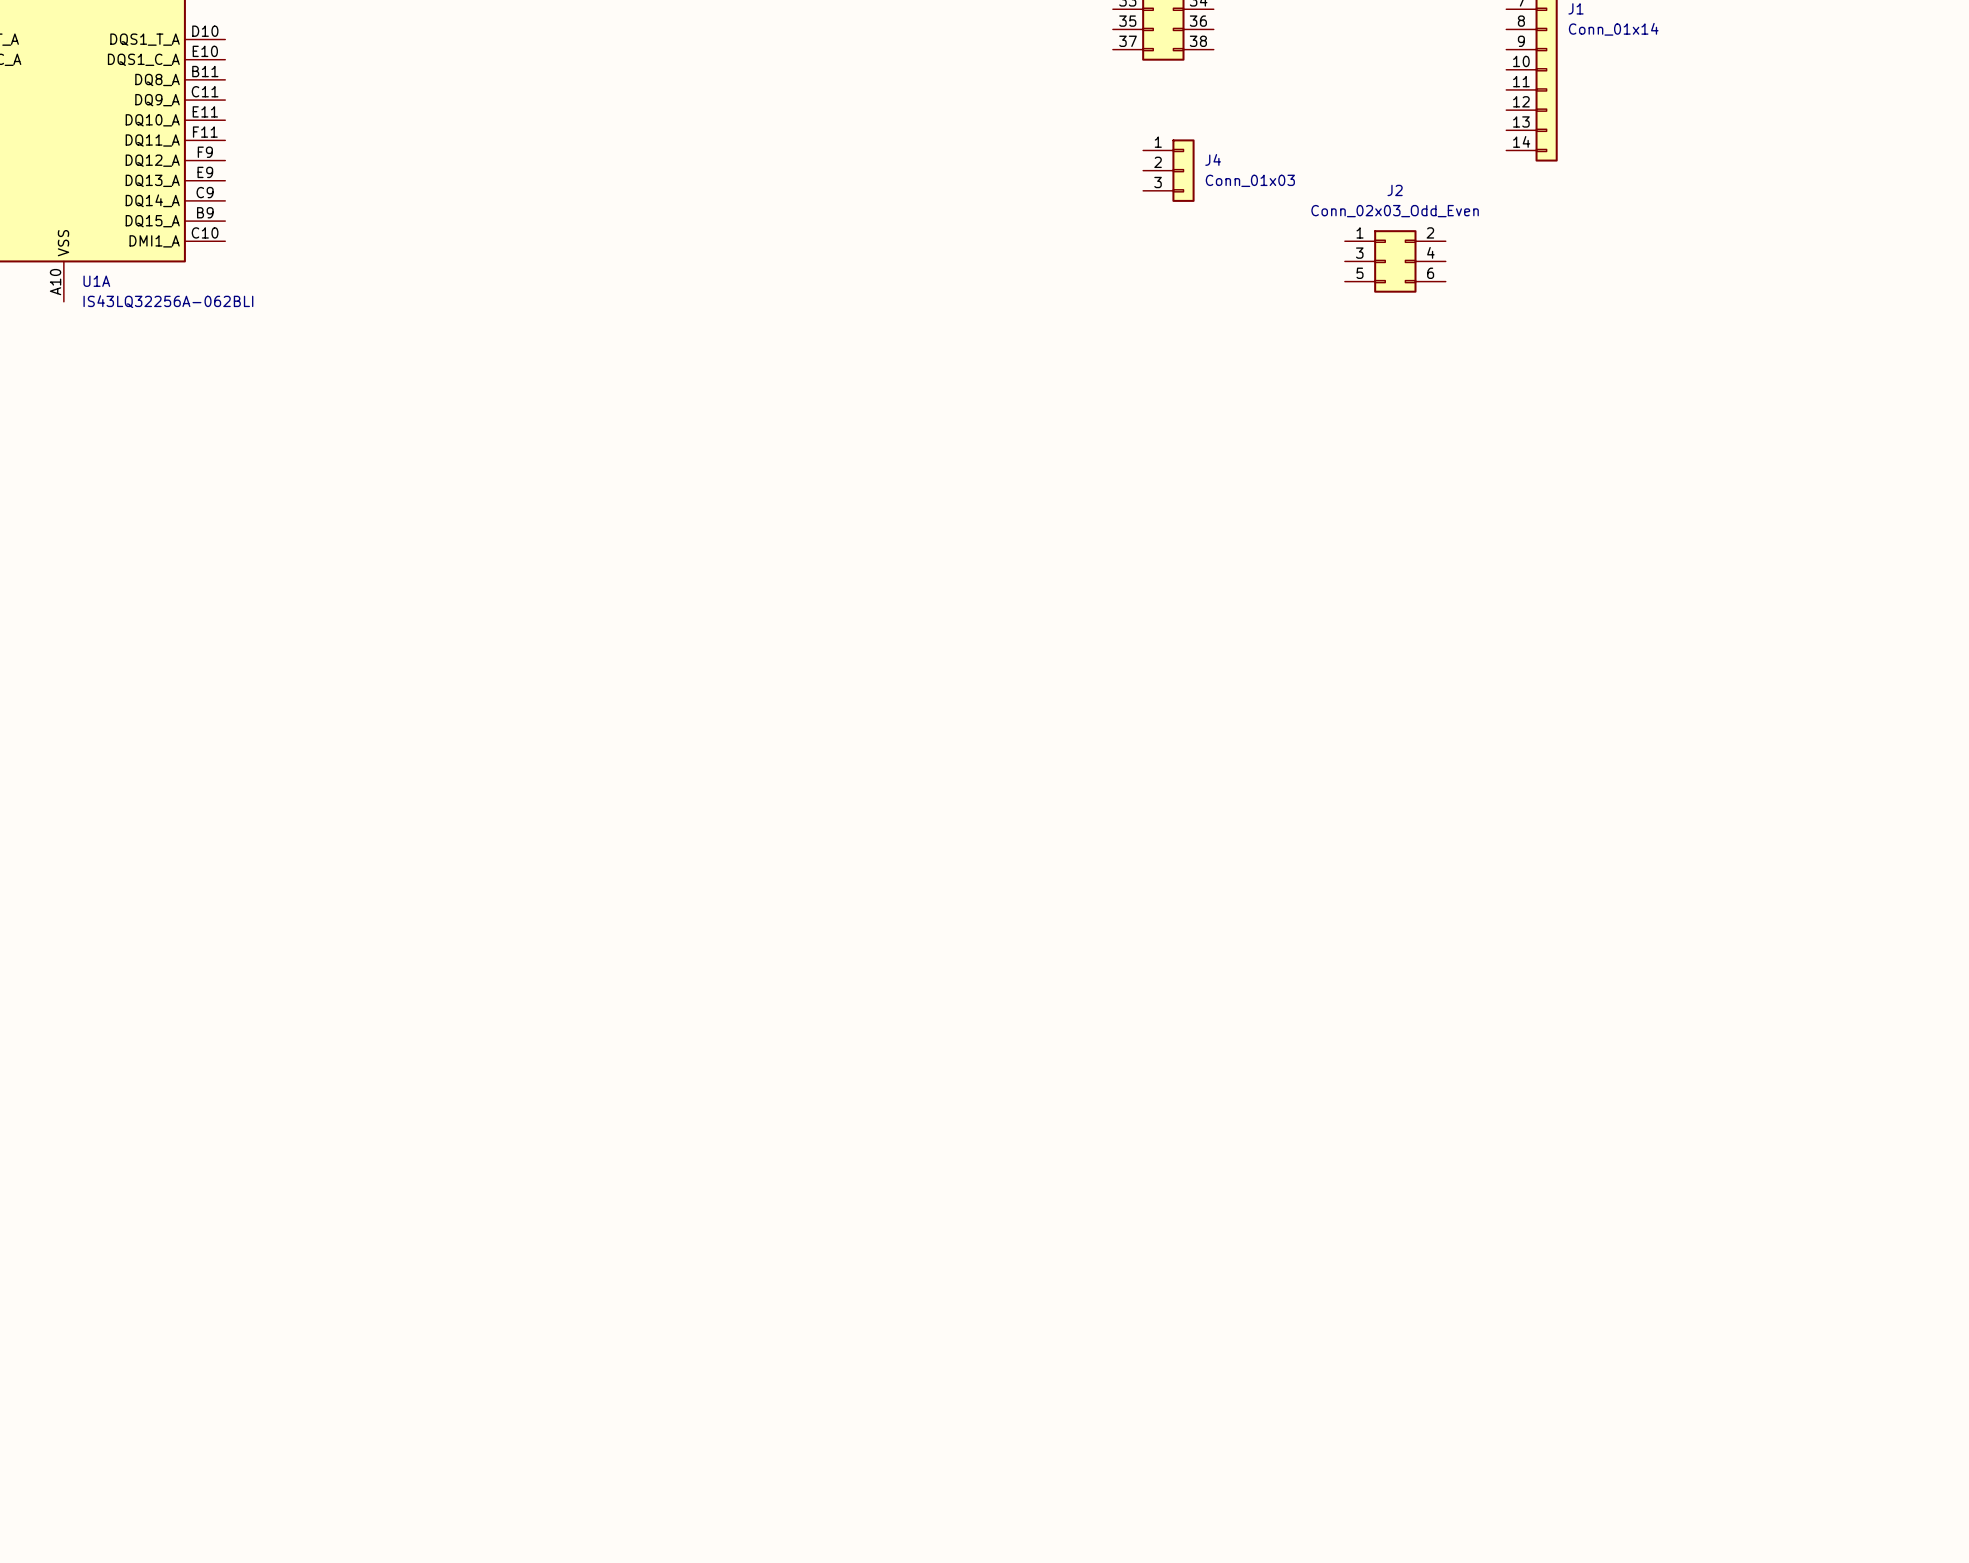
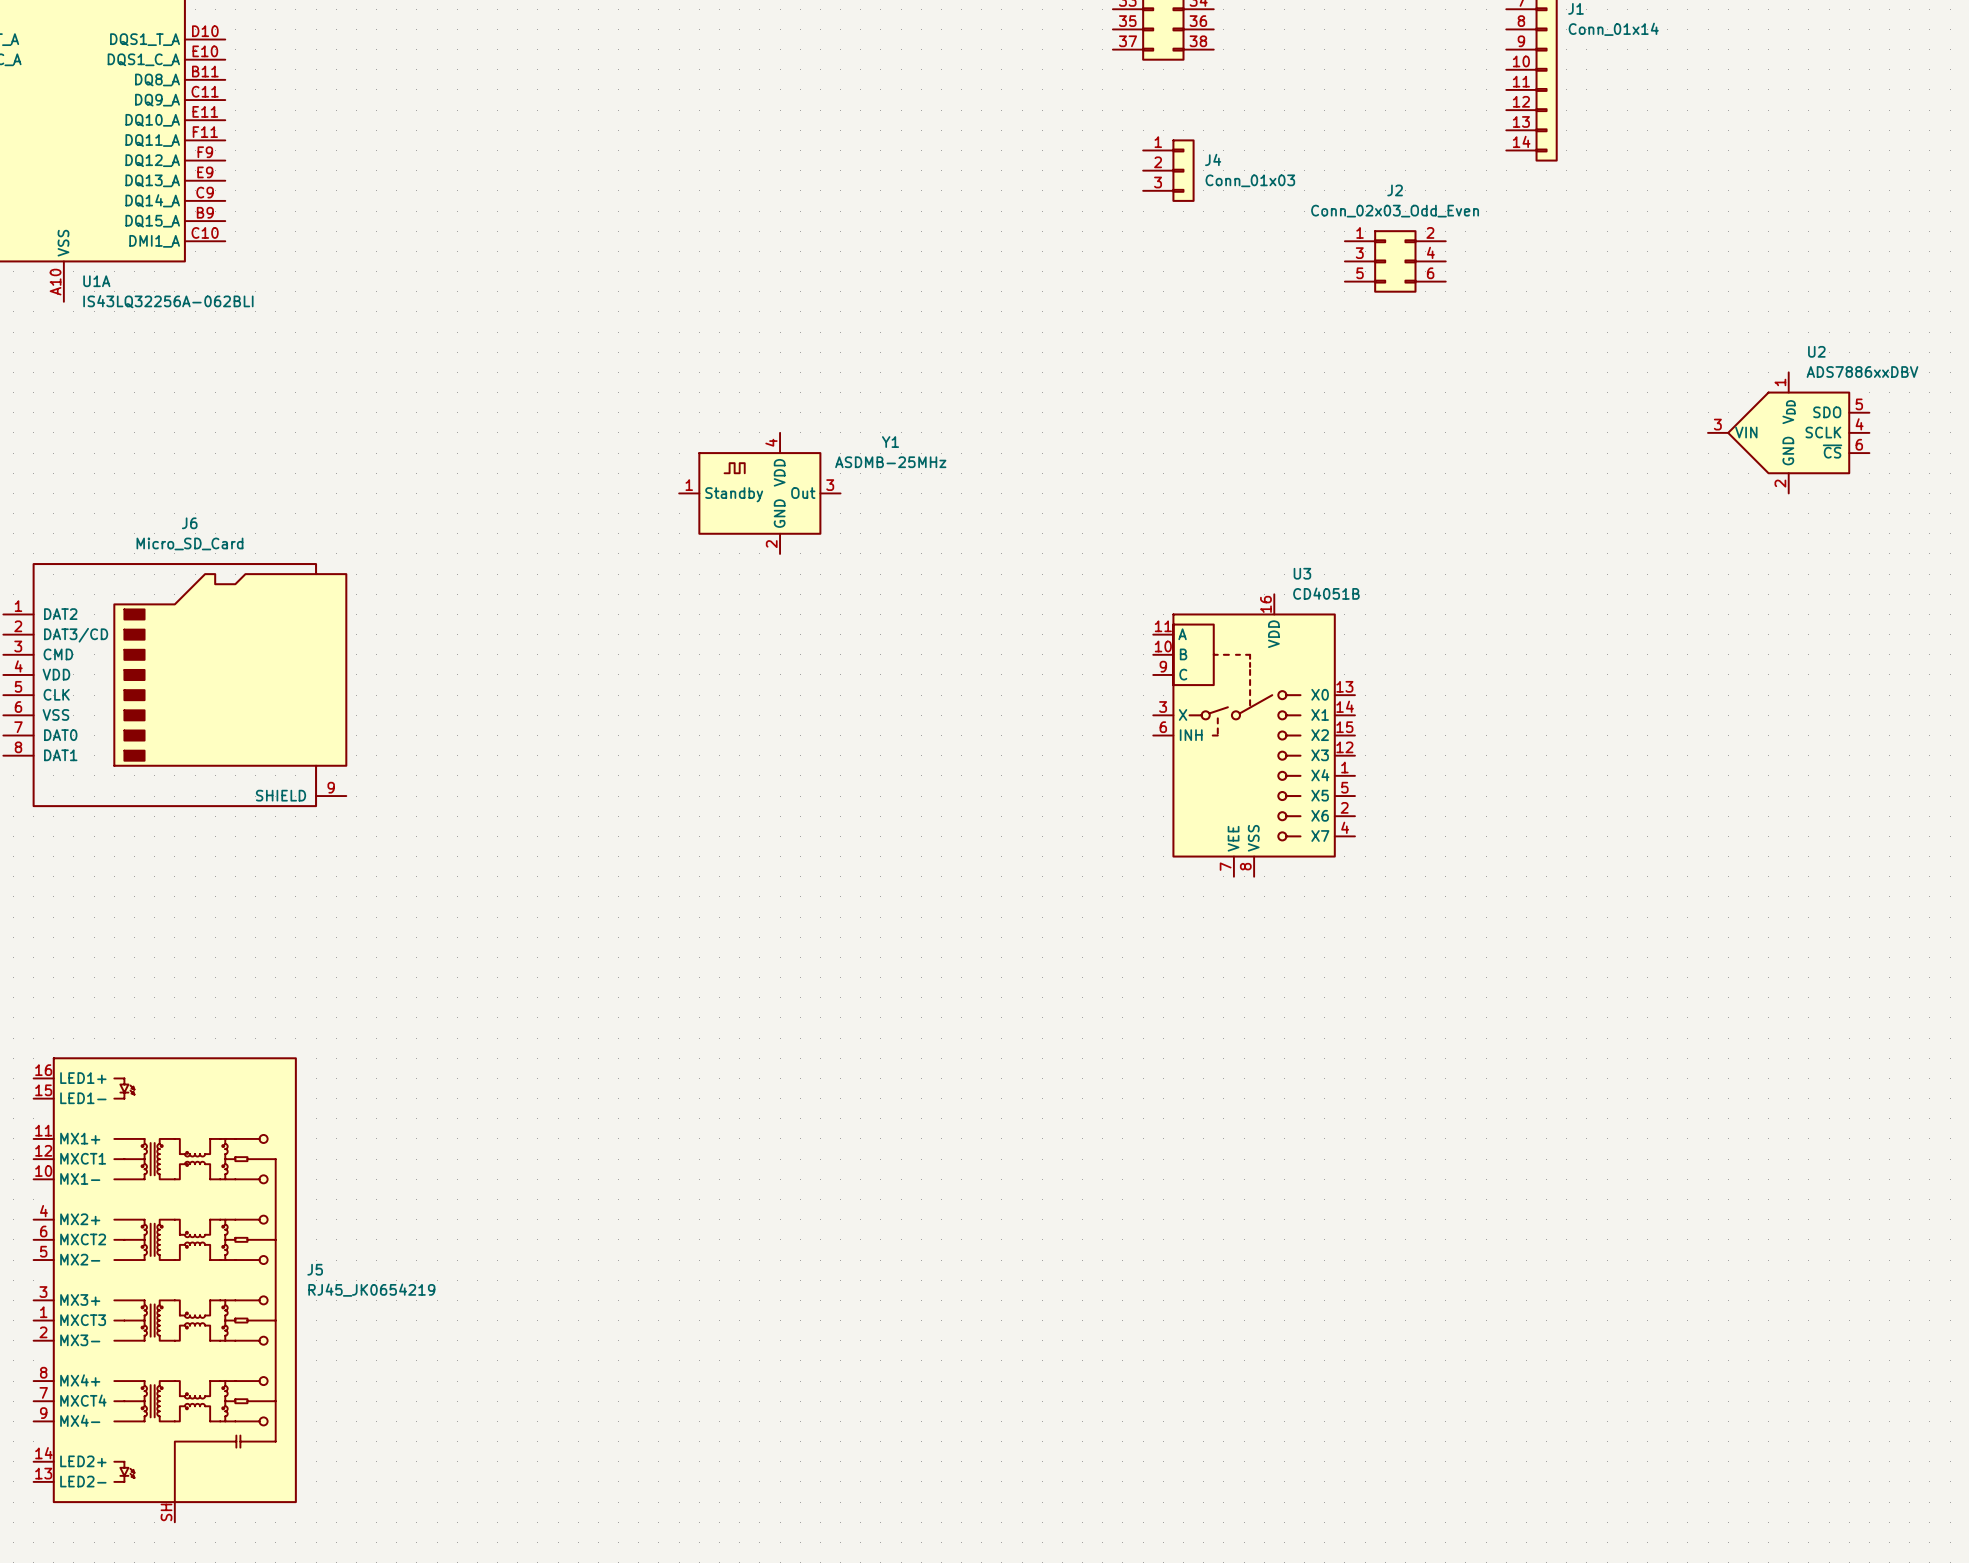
U2: none -> ADS7886xxDBV (1788, 432)
Y1: none -> ASDMB-25MHz (759, 493)
J6: none -> Micro_SD_Card (175, 685)
U3: none -> CD4051B (1254, 735)
J5: none -> RJ45_JK0654219 (165, 1289)

